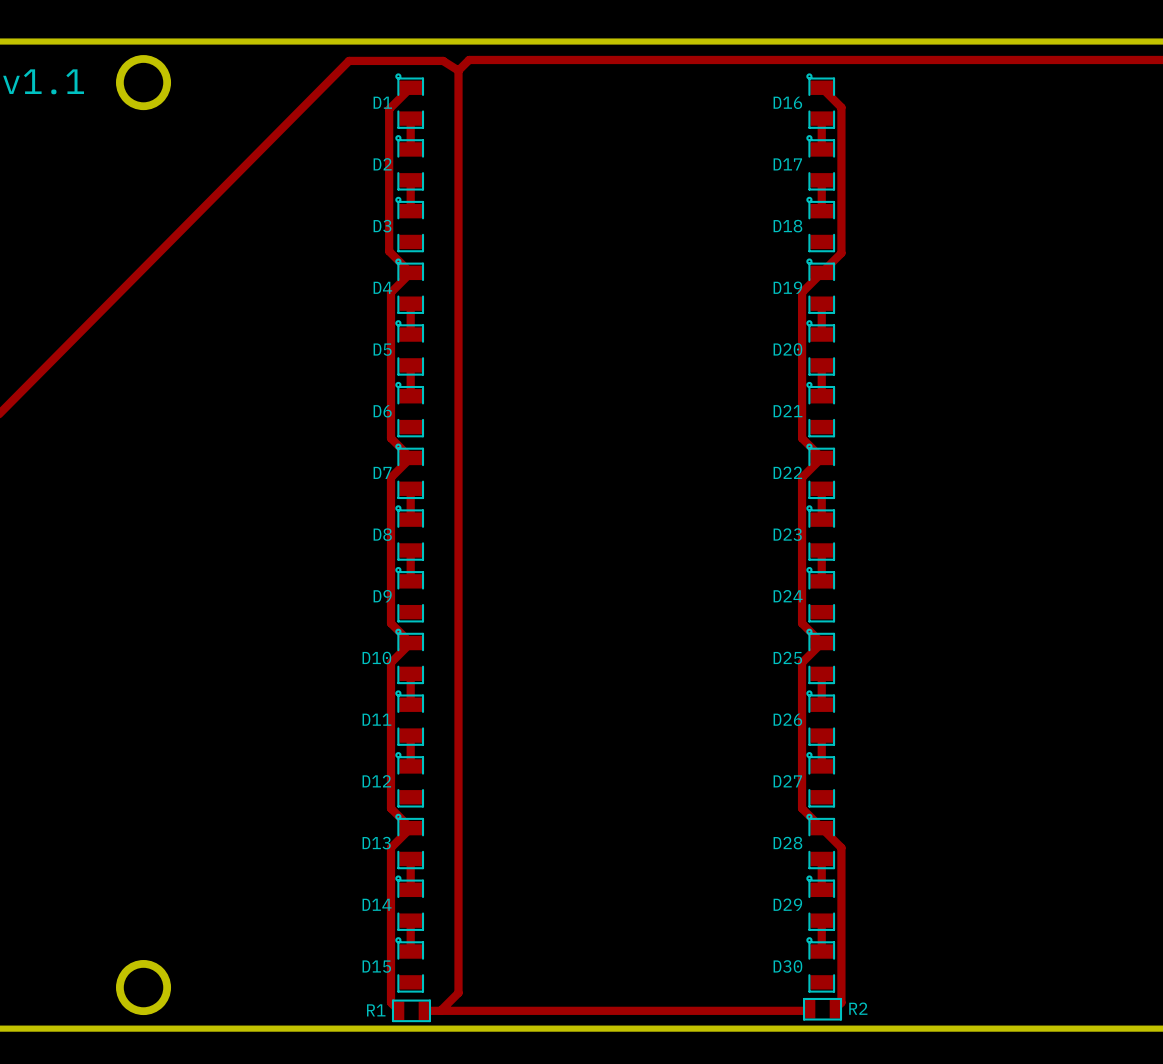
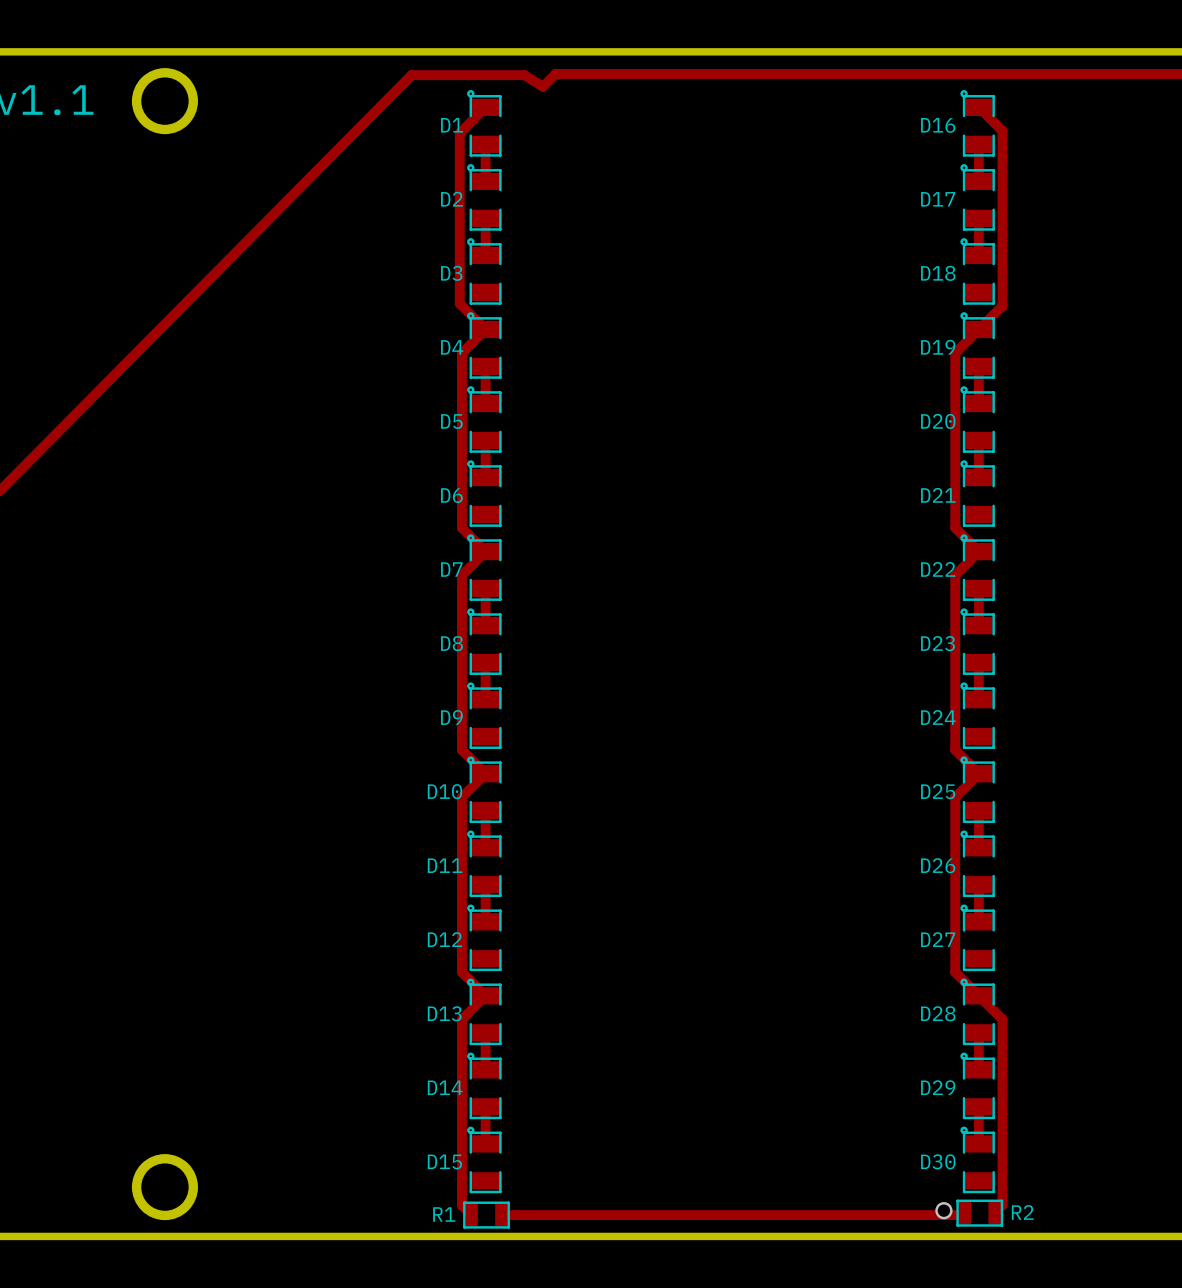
top track: (458, 70) (458, 992) (440, 1010) -> none
via: none -> (943, 1210)

